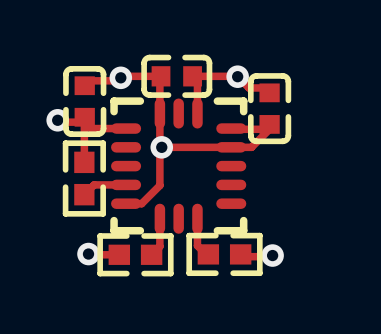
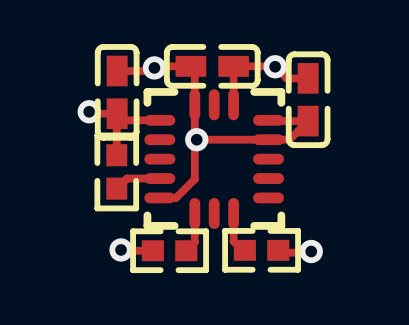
part footprint: [141, 54, 213, 98] -> [163, 44, 261, 89]
part footprint: [63, 65, 107, 138] -> [94, 44, 140, 141]
part footprint: [247, 73, 292, 145] -> [285, 51, 331, 149]

